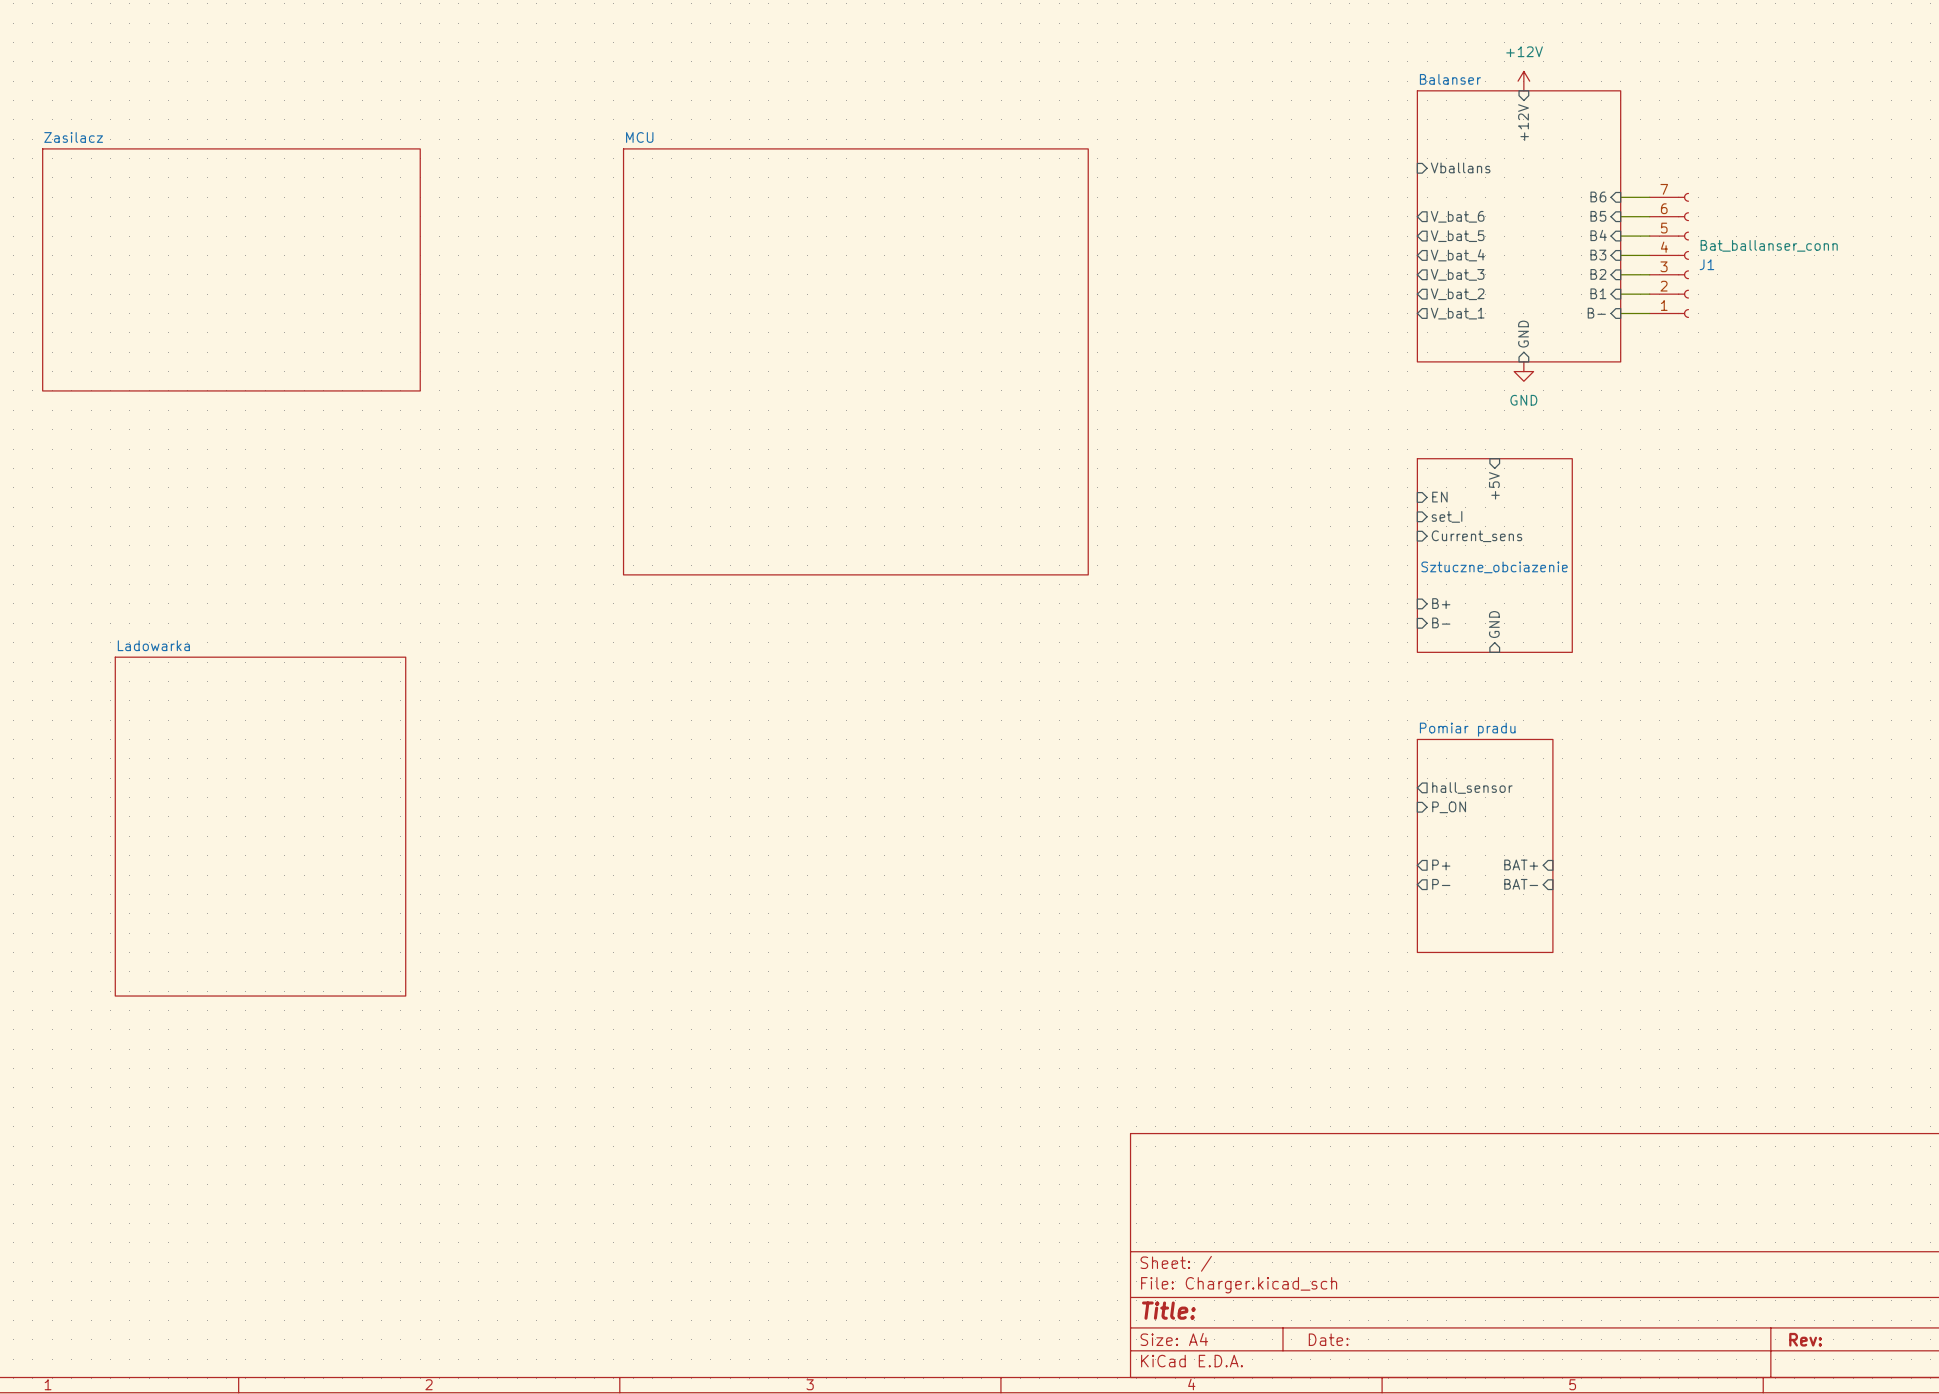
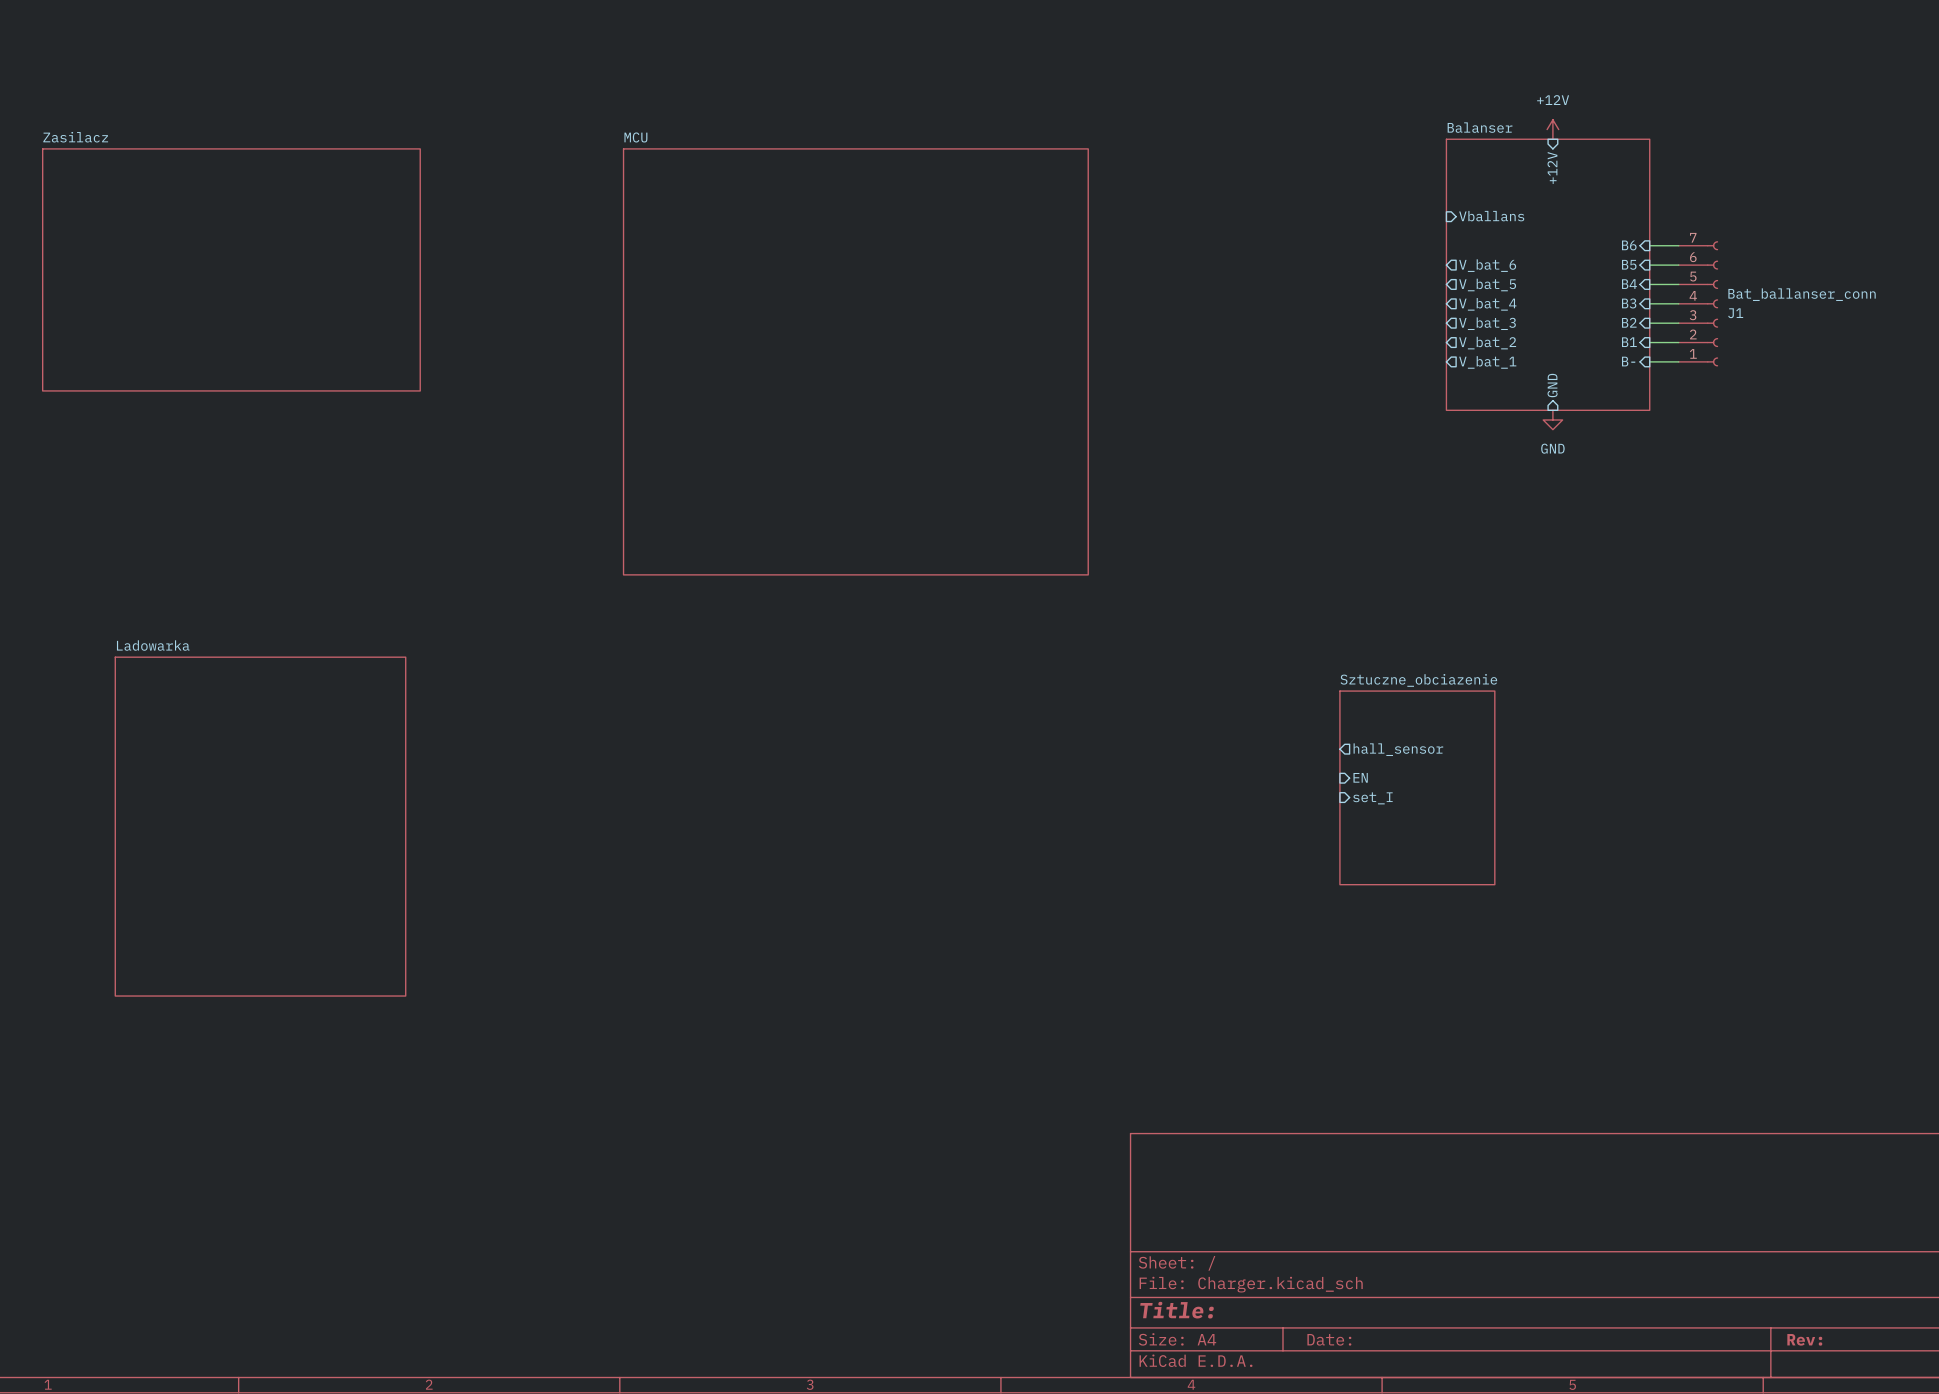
power symbol position: +12V (1523, 81) -> +12V (1552, 129)
sheet pin position: +12V (1523, 122) -> +12V (1552, 168)
sheet pin position: Vballans (1460, 167) -> Vballans (1491, 216)
sheet pin position: B6 (1598, 196) -> B6 (1629, 245)
wire: (1620, 197) (1649, 197) -> (1649, 245) (1678, 245)
sheet pin position: V_bat_6 (1457, 216) -> V_bat_6 (1487, 265)
sheet pin position: B5 (1598, 216) -> B5 (1629, 264)
wire: (1620, 216) (1649, 216) -> (1649, 265) (1678, 265)
sheet Balanser position: (1519, 226) -> (1548, 274)
sheet pin position: B4 (1598, 235) -> B4 (1629, 284)
sheet pin position: V_bat_5 (1457, 236) -> V_bat_5 (1487, 284)
wire: (1620, 236) (1649, 236) -> (1649, 284) (1678, 284)
sheet pin position: V_bat_4 (1457, 255) -> V_bat_4 (1487, 304)
sheet pin position: B3 (1598, 255) -> B3 (1629, 303)
wire: (1620, 255) (1649, 255) -> (1649, 303) (1678, 303)
J1 position: (1669, 255) -> (1698, 303)
sheet pin position: V_bat_3 (1457, 274) -> V_bat_3 (1487, 323)
sheet pin position: B2 (1598, 274) -> B2 (1629, 322)
wire: (1620, 274) (1649, 274) -> (1649, 323) (1678, 323)
sheet pin position: B1 (1598, 293) -> B1 (1629, 342)
sheet pin position: V_bat_2 (1457, 294) -> V_bat_2 (1487, 343)
wire: (1620, 294) (1649, 294) -> (1649, 342) (1678, 342)
sheet pin position: V_bat_1 (1457, 313) -> V_bat_1 (1487, 362)
sheet pin position: B- (1596, 313) -> B- (1628, 361)
wire: (1620, 313) (1649, 313) -> (1649, 361) (1678, 361)
sheet pin position: GND (1523, 334) -> GND (1552, 385)
power symbol position: GND (1523, 371) -> GND (1552, 419)
sheet pin: +5V (1494, 485) -> none
sheet pin: EN (1439, 497) -> none
sheet pin: set_I (1447, 516) -> none
sheet pin: Current_sens (1477, 536) -> none
sheet Sztuczne_obciazenie: (1494, 555) -> none
sheet pin: B+ (1441, 603) -> none
sheet pin: B- (1441, 622) -> none
sheet pin: GND (1494, 624) -> none
sheet pin: none -> EN (1360, 777)
sheet Sztuczne_obciazenie: none -> (1417, 787)
sheet pin position: hall_sensor (1472, 787) -> hall_sensor (1398, 749)
sheet pin: none -> set_I (1372, 798)
sheet pin: P_ON (1449, 807) -> none
sheet Pomiar pradu: (1485, 845) -> none
sheet pin: P+ (1441, 864) -> none
sheet pin: BAT+ (1521, 864) -> none
sheet pin: P- (1441, 884) -> none
sheet pin: BAT- (1521, 884) -> none

